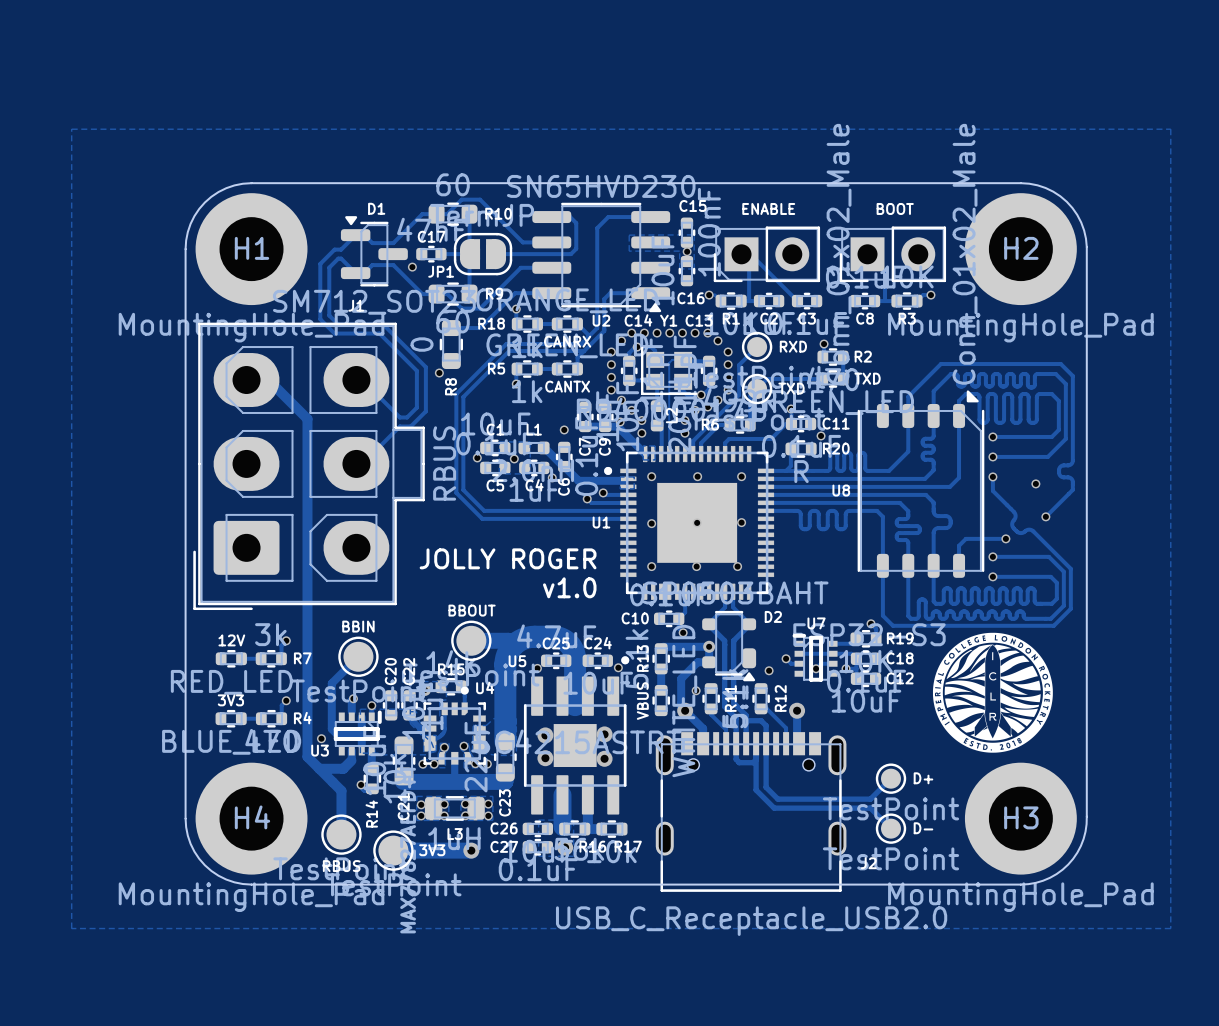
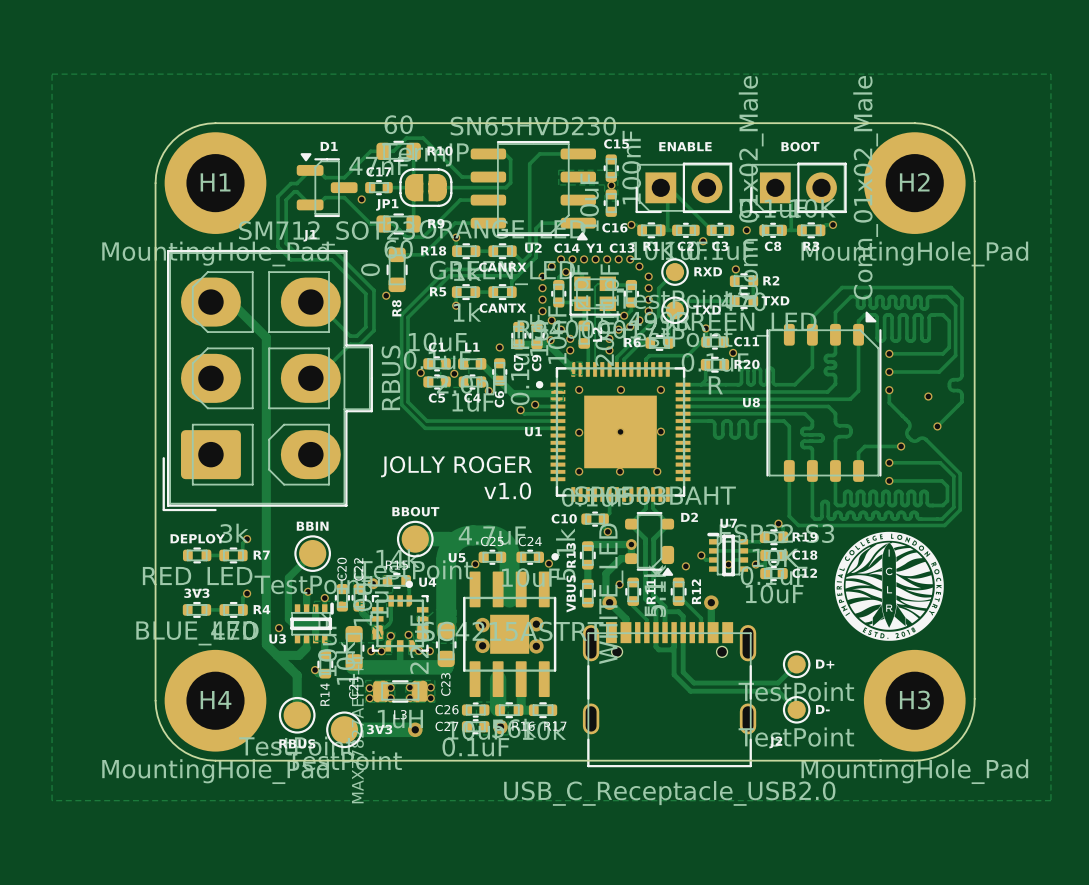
via: none -> (746, 230)
via: none -> (703, 241)
12V name: 12V (231, 640) -> DEPLOY (197, 538)

